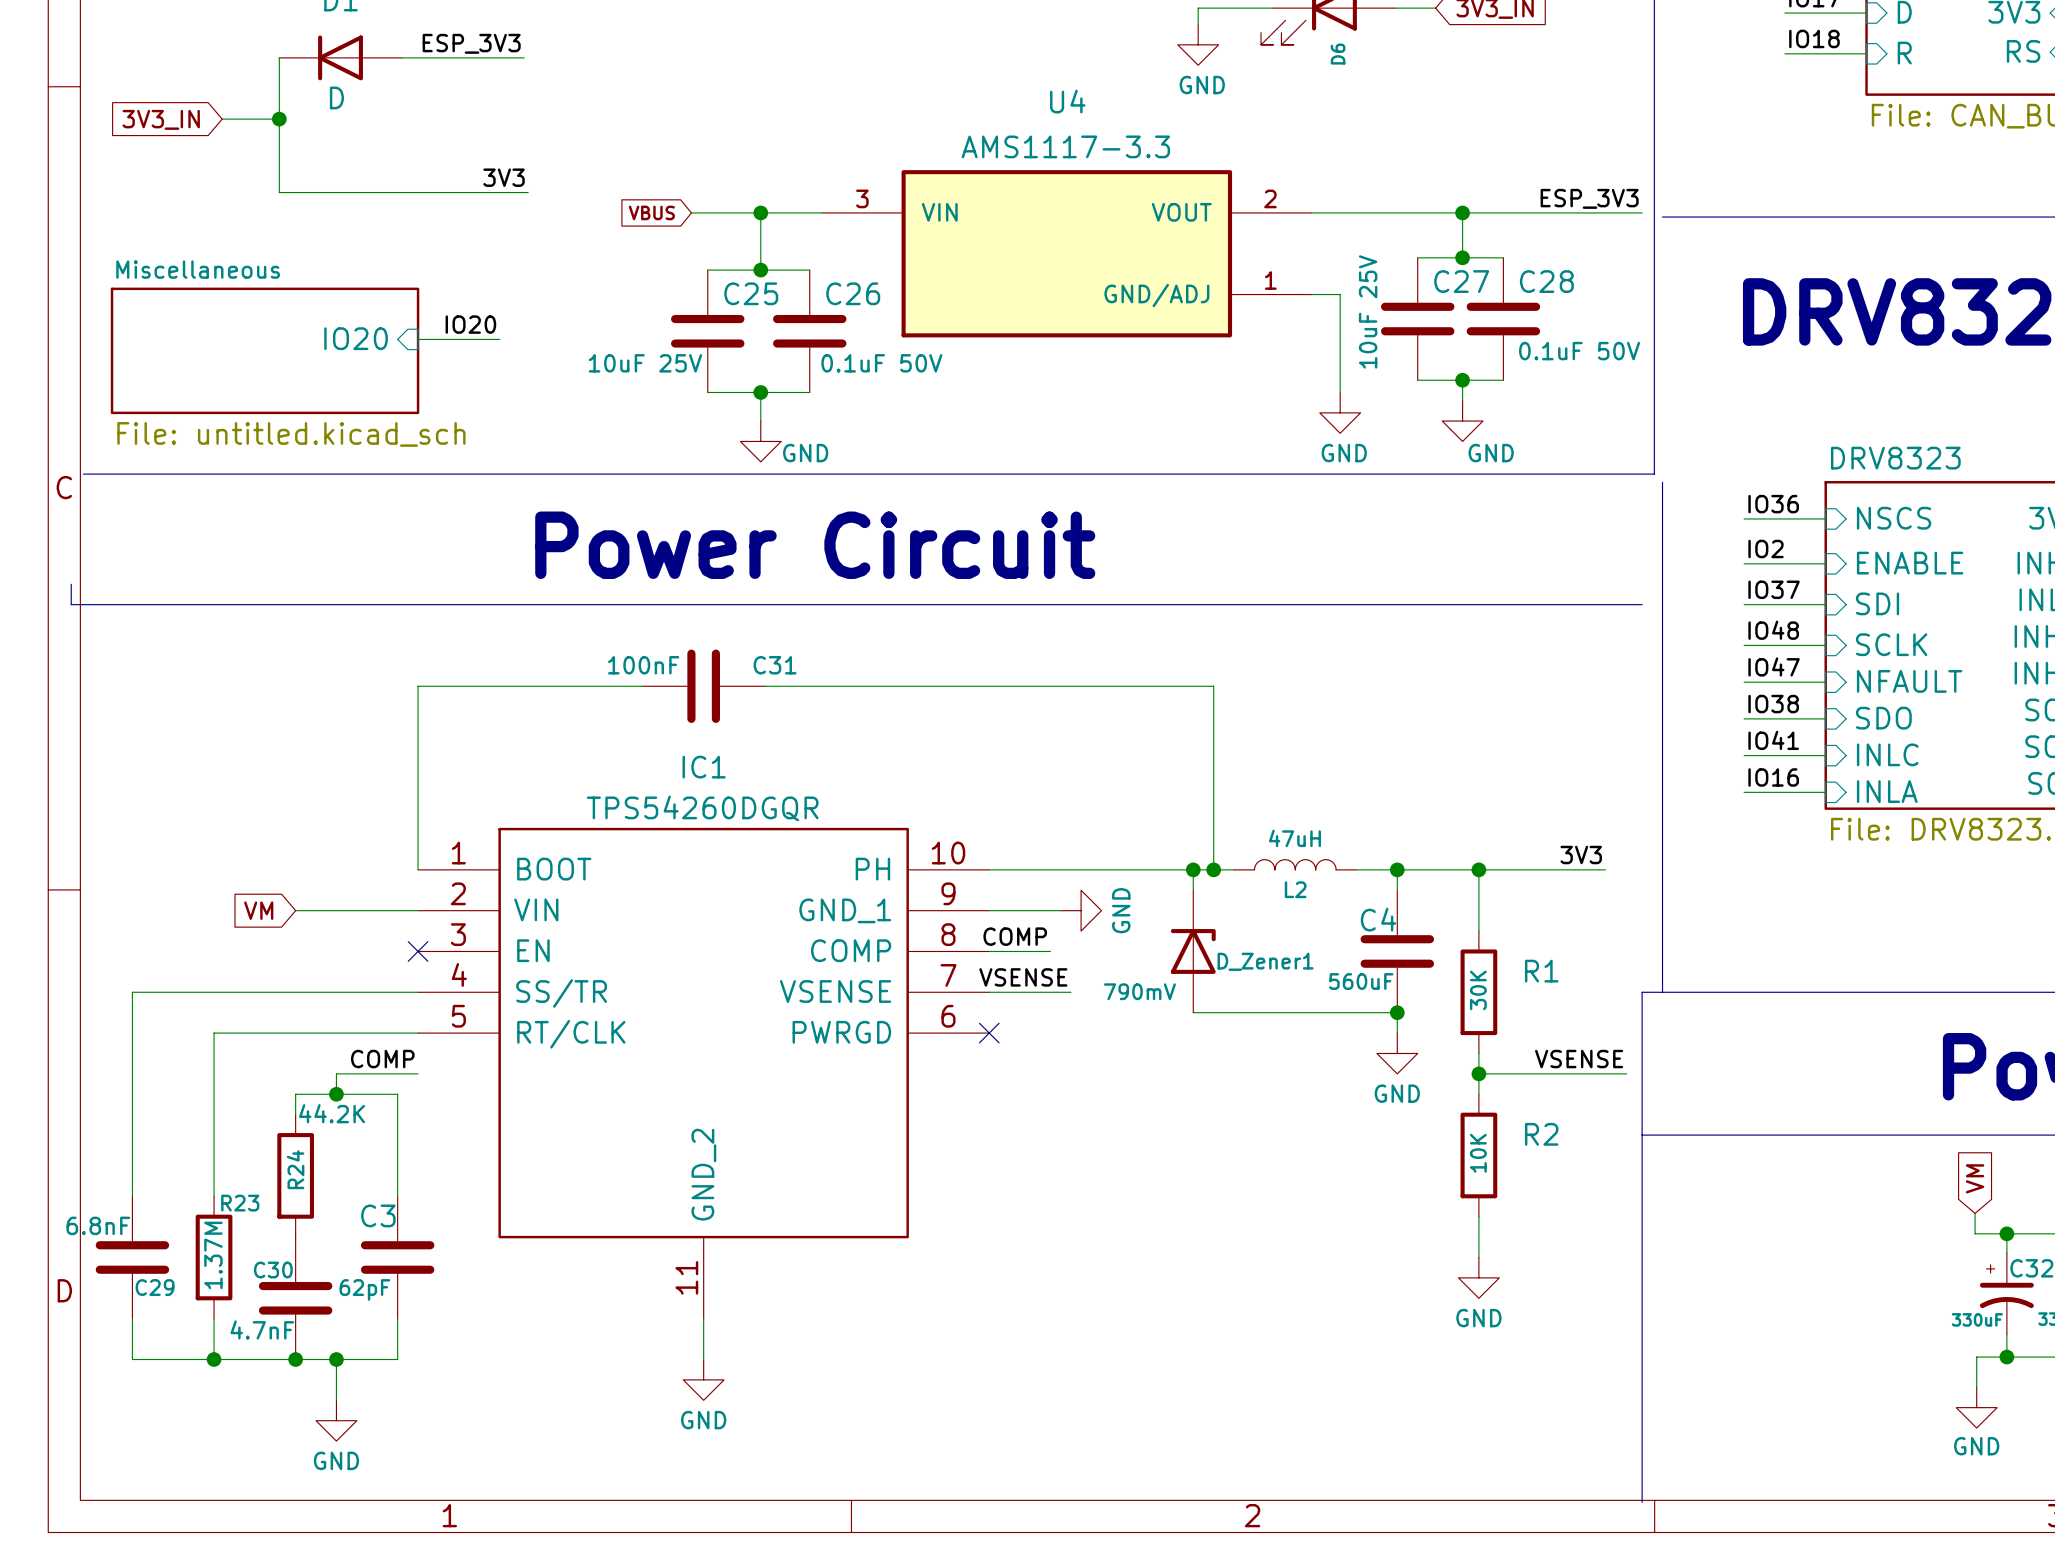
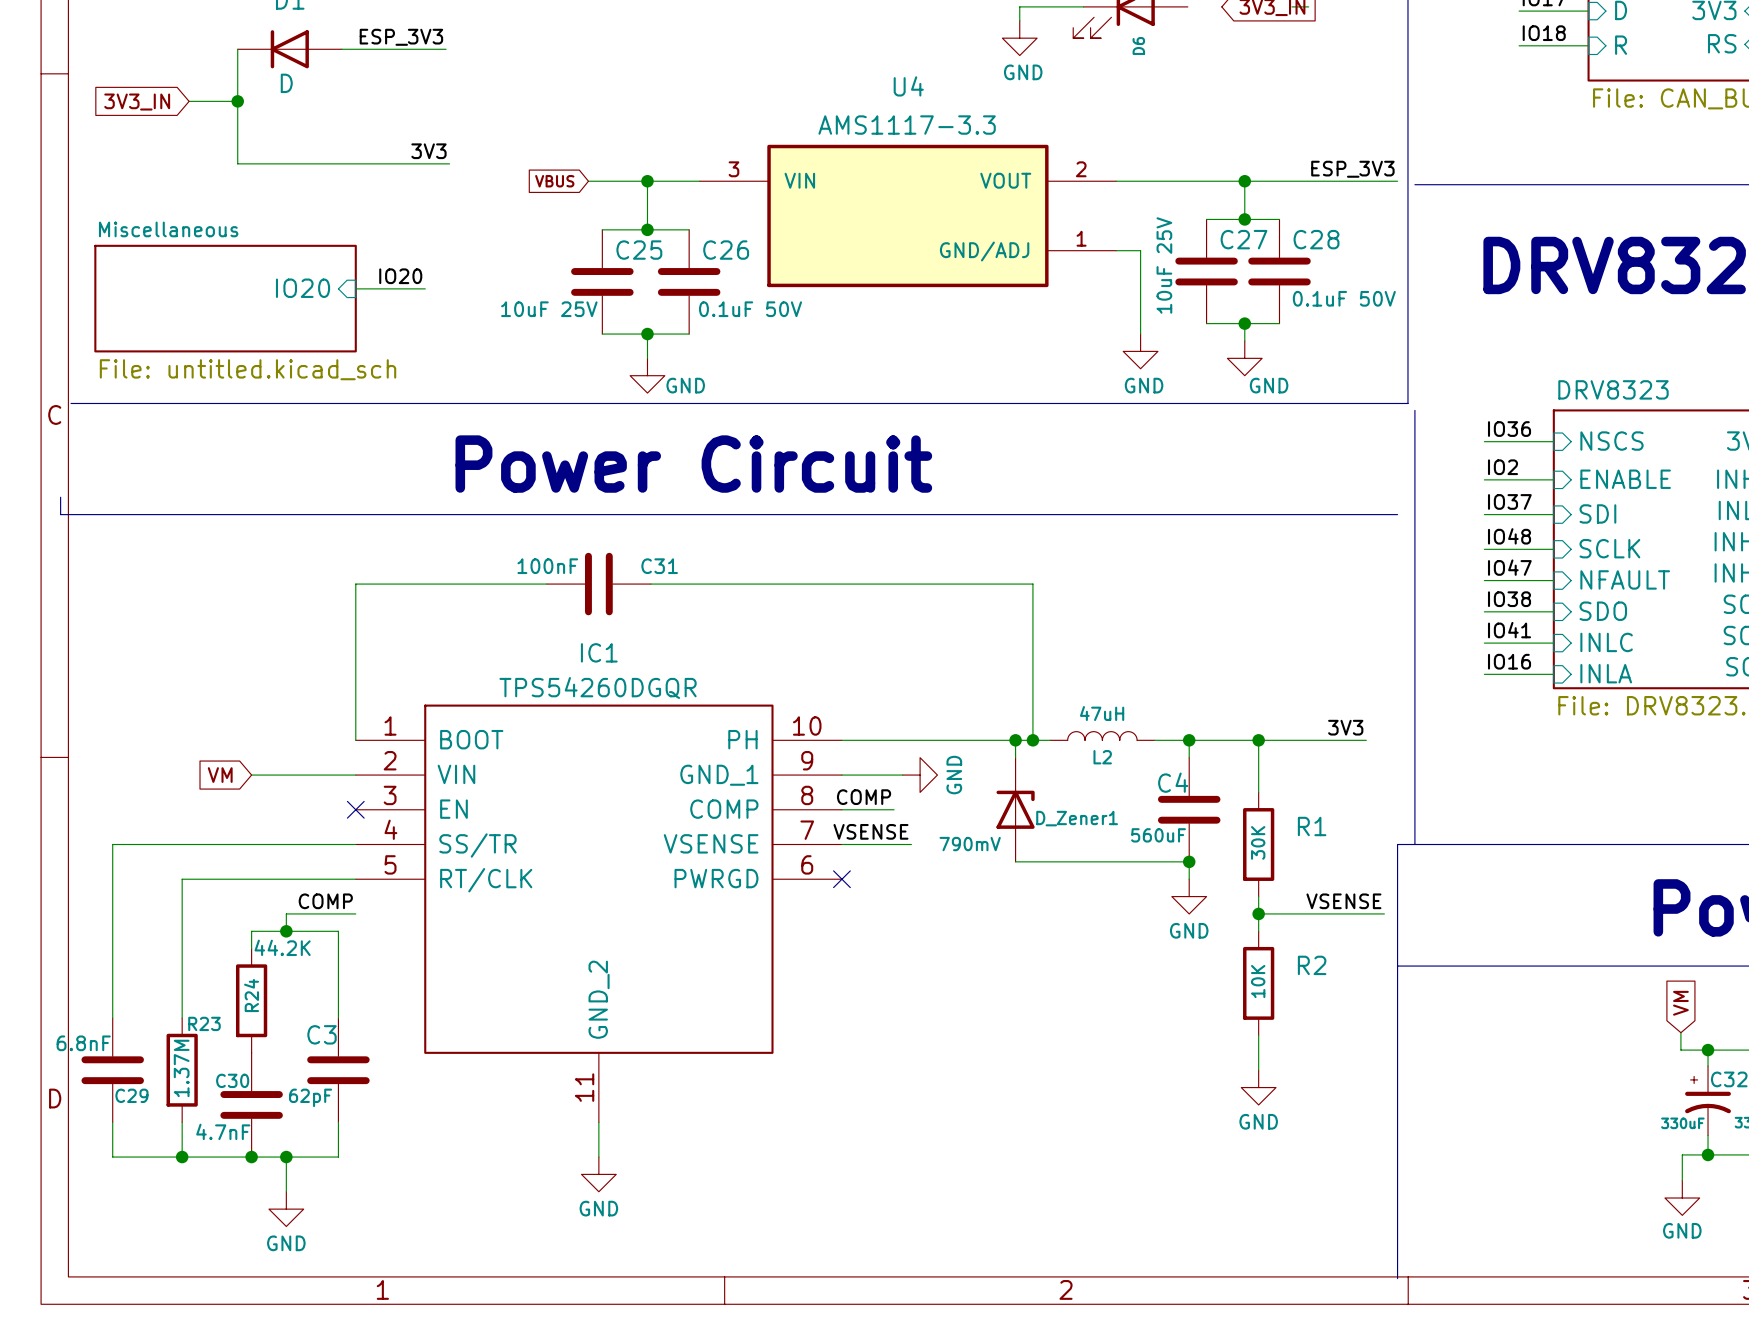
wire: (1395, 8) (1435, 8) -> none
wire: none -> (1292, 6) (1308, 6)

